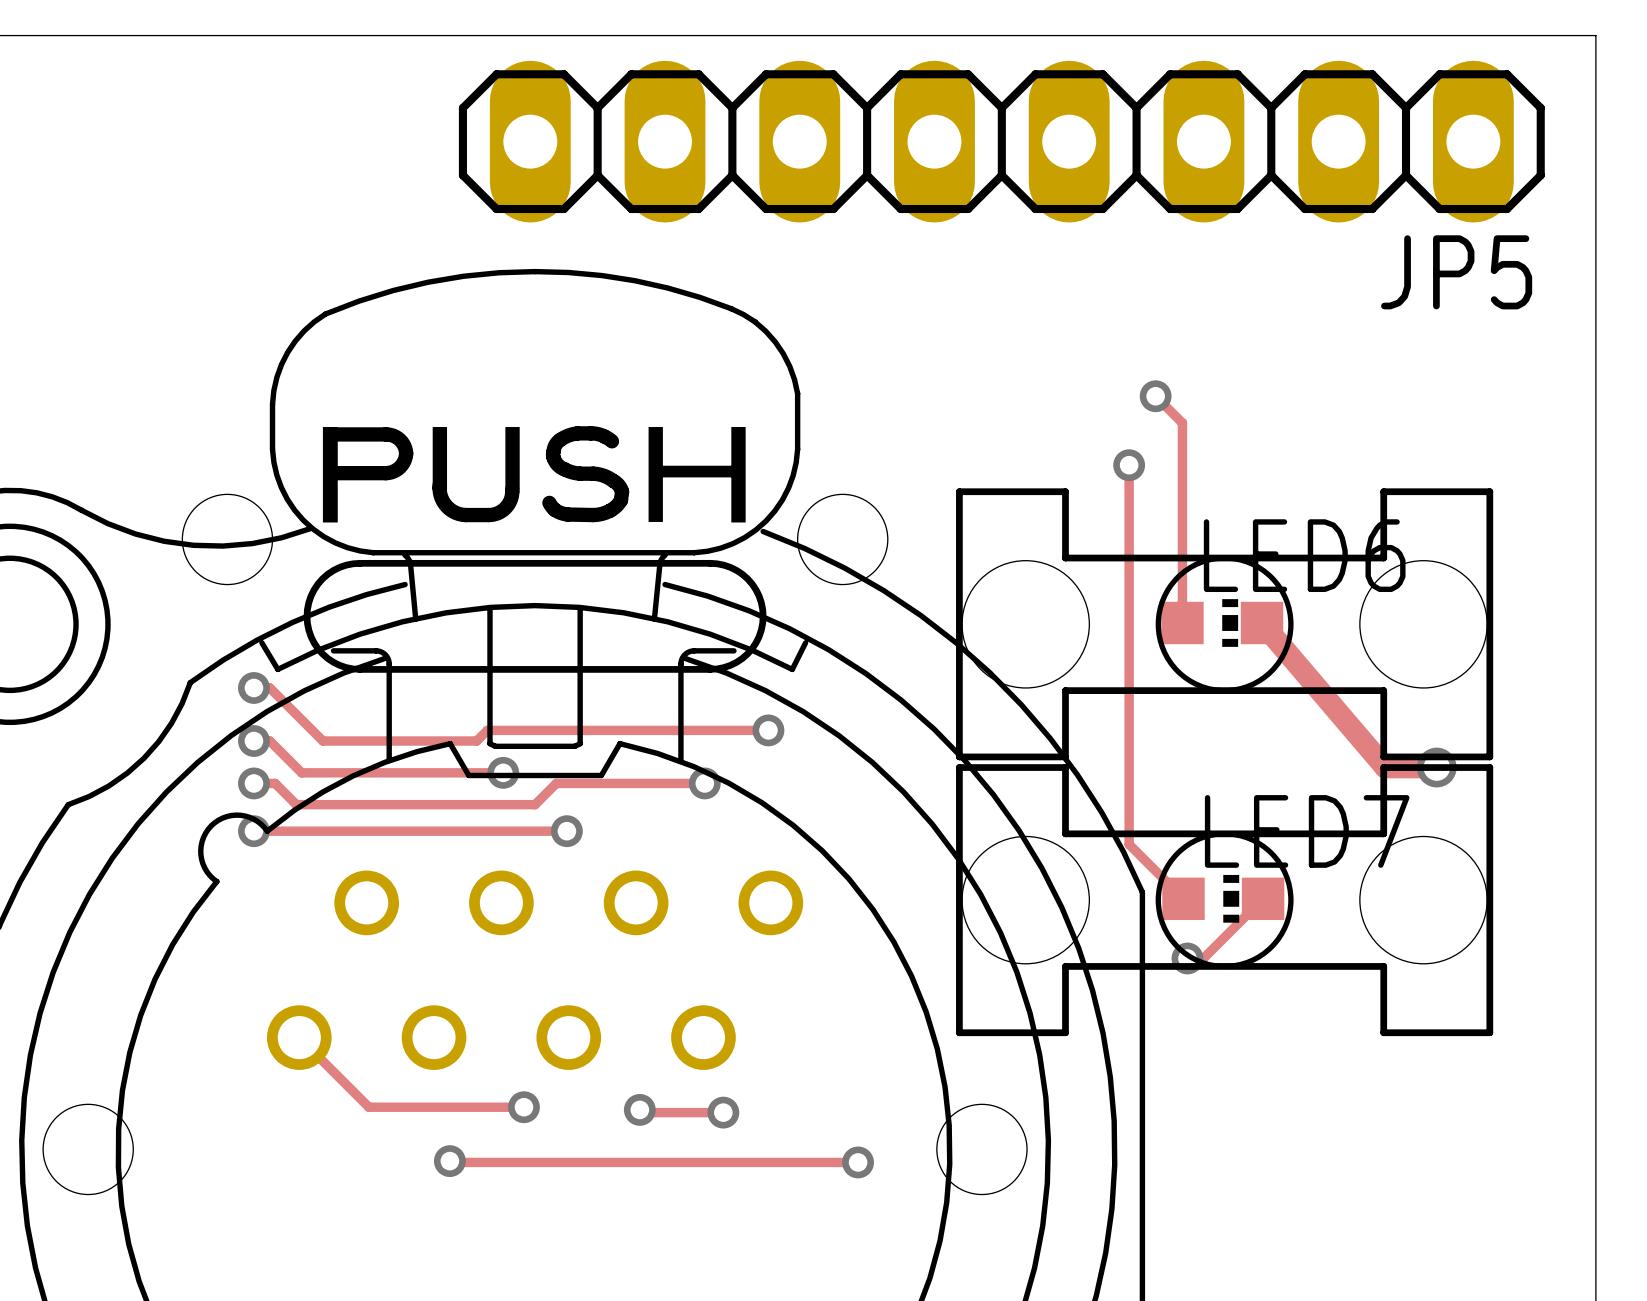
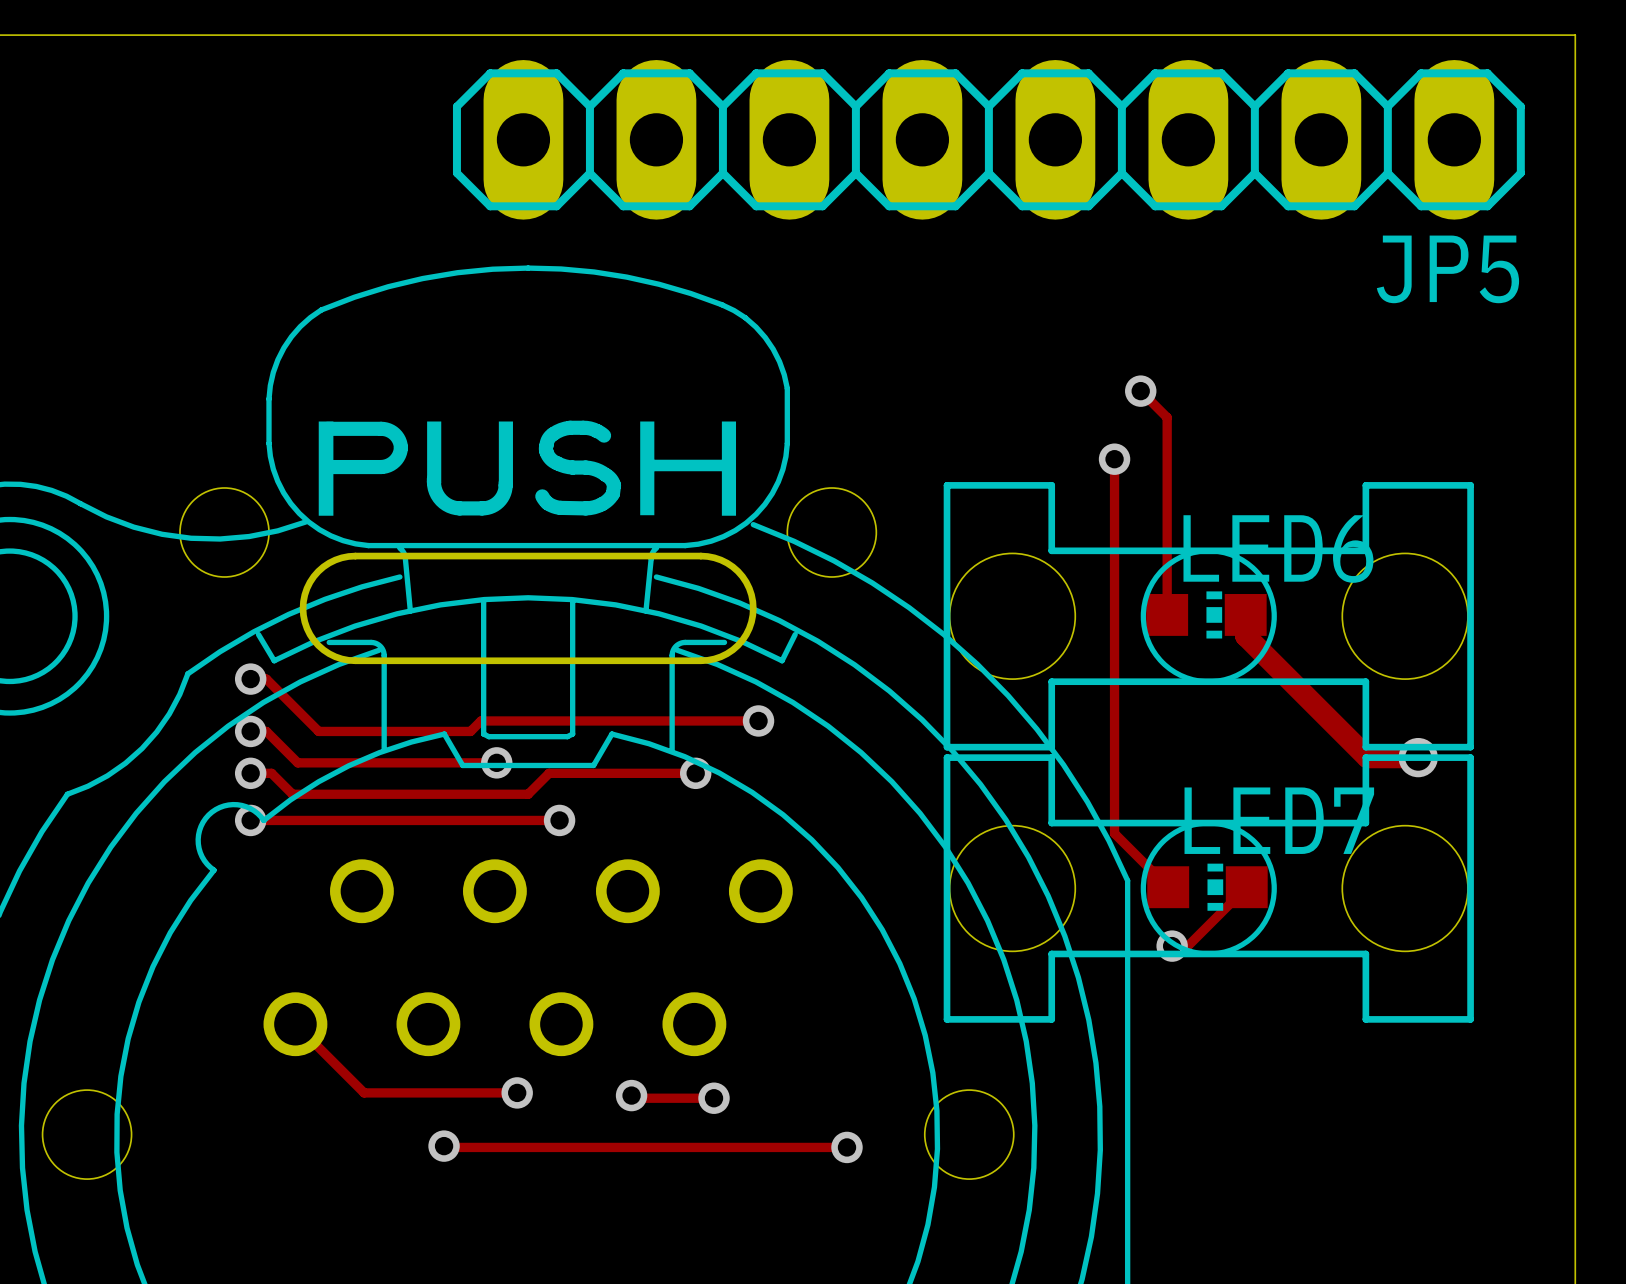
track: (1262, 623) (1385, 767) -> (1245, 614) (1245, 635) (1367, 757)

